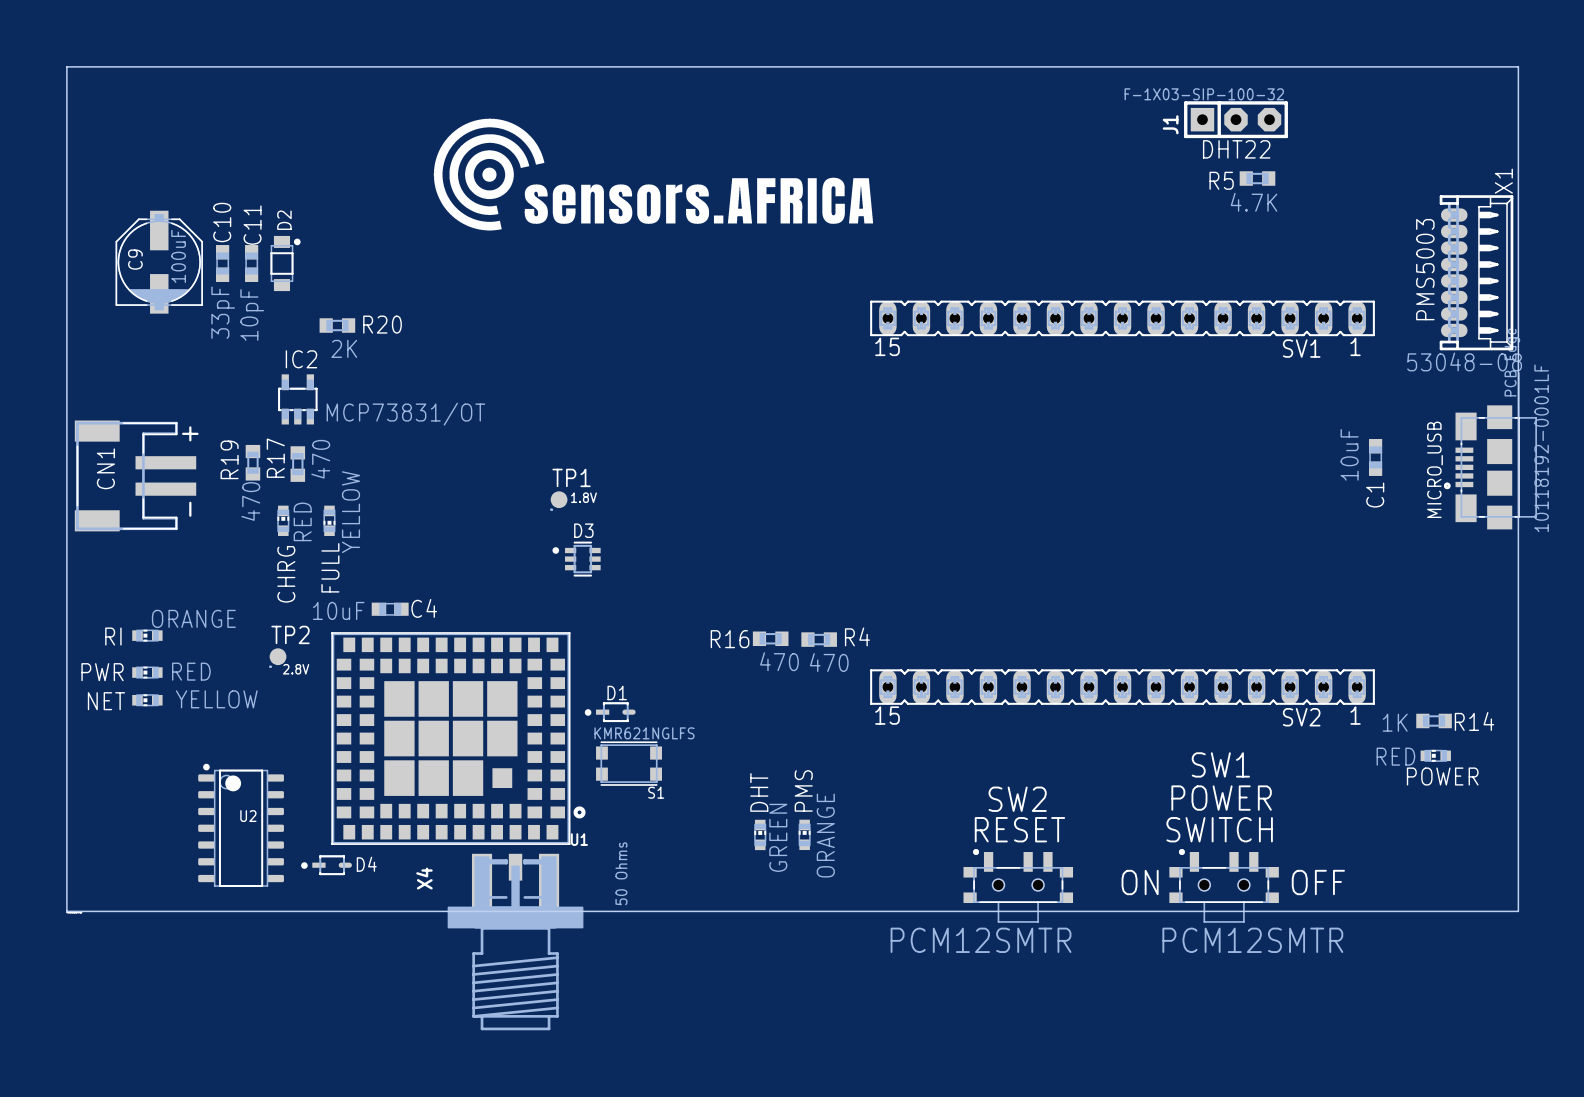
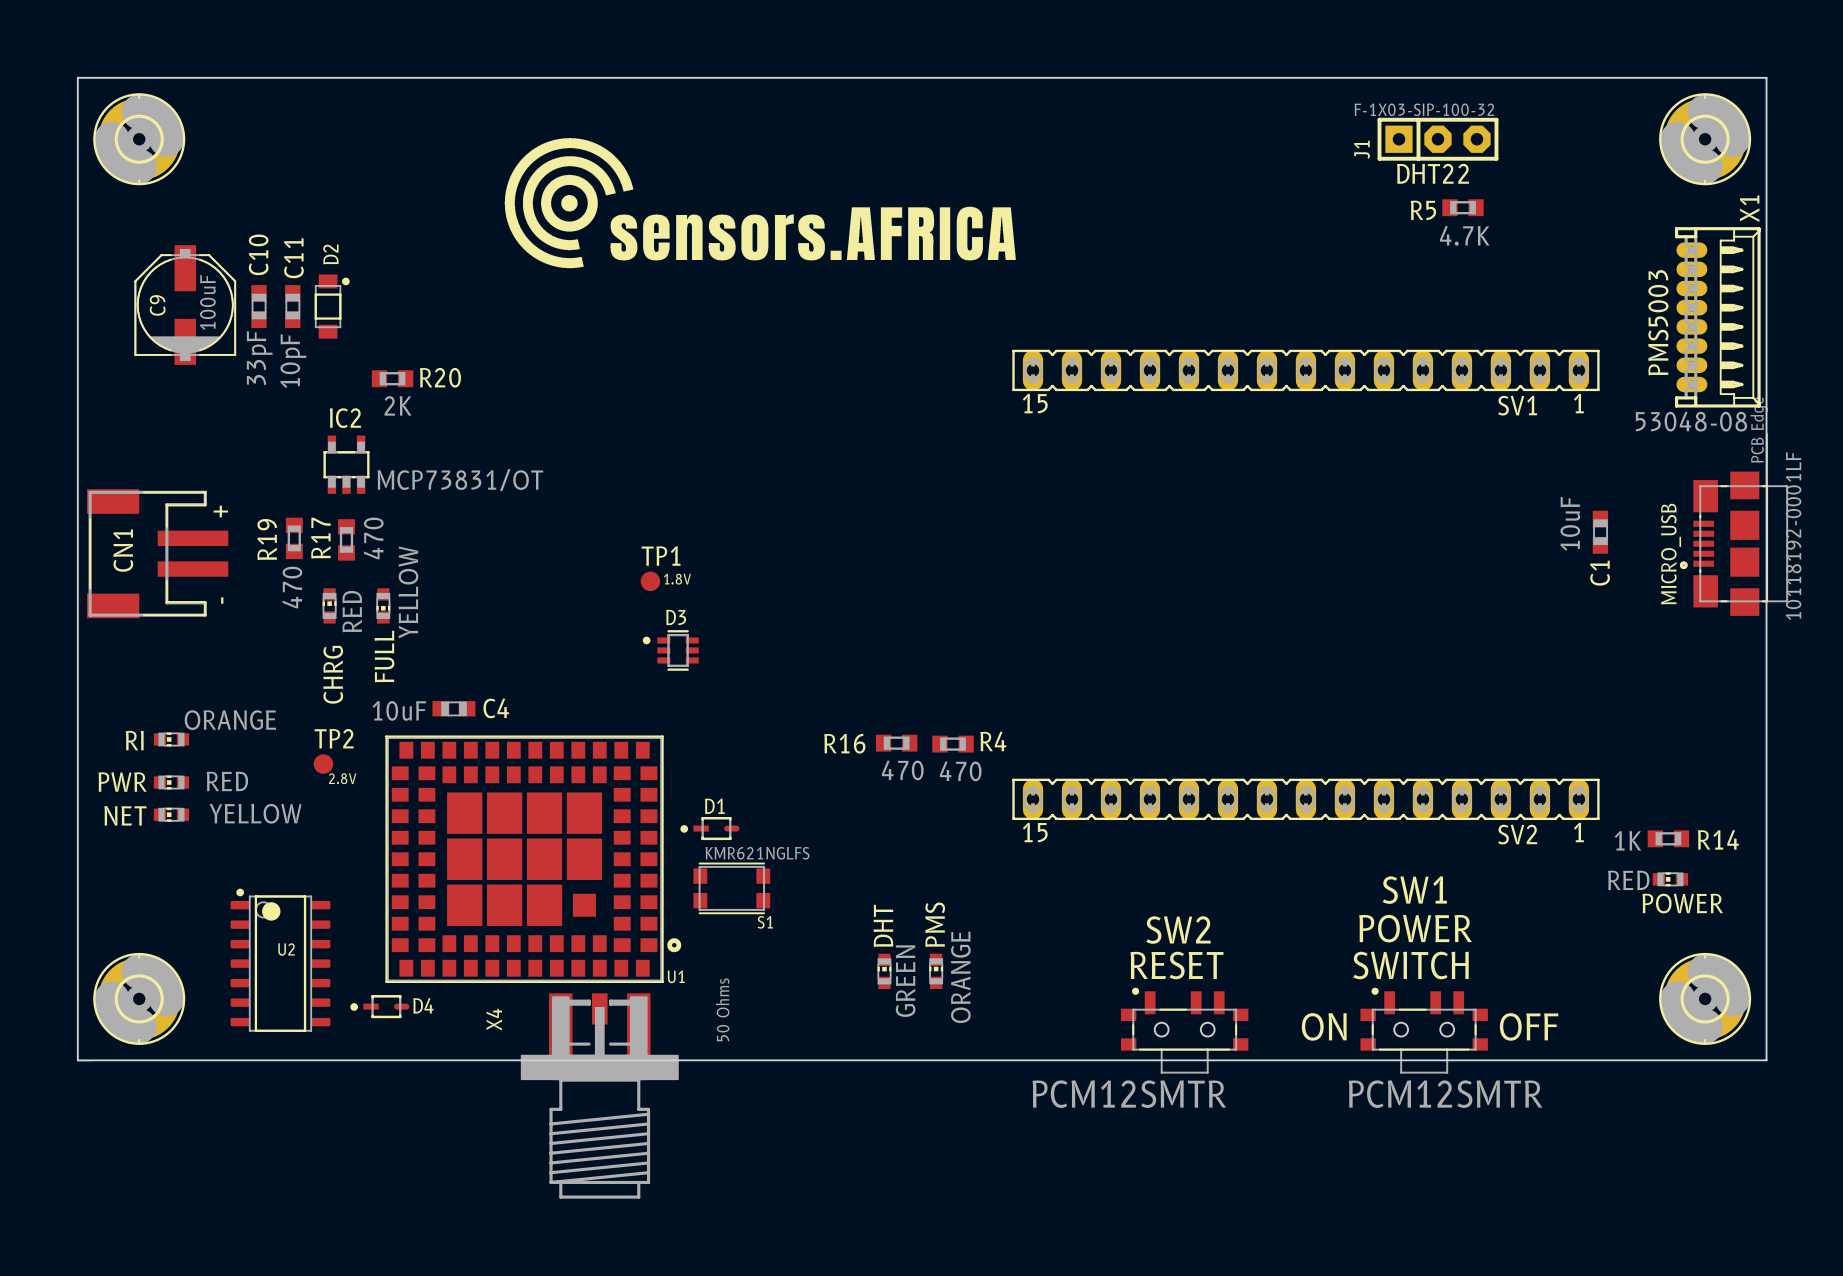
part: none -> (139, 139)
part: none -> (1705, 139)
part: none -> (139, 998)
part: none -> (1705, 998)

